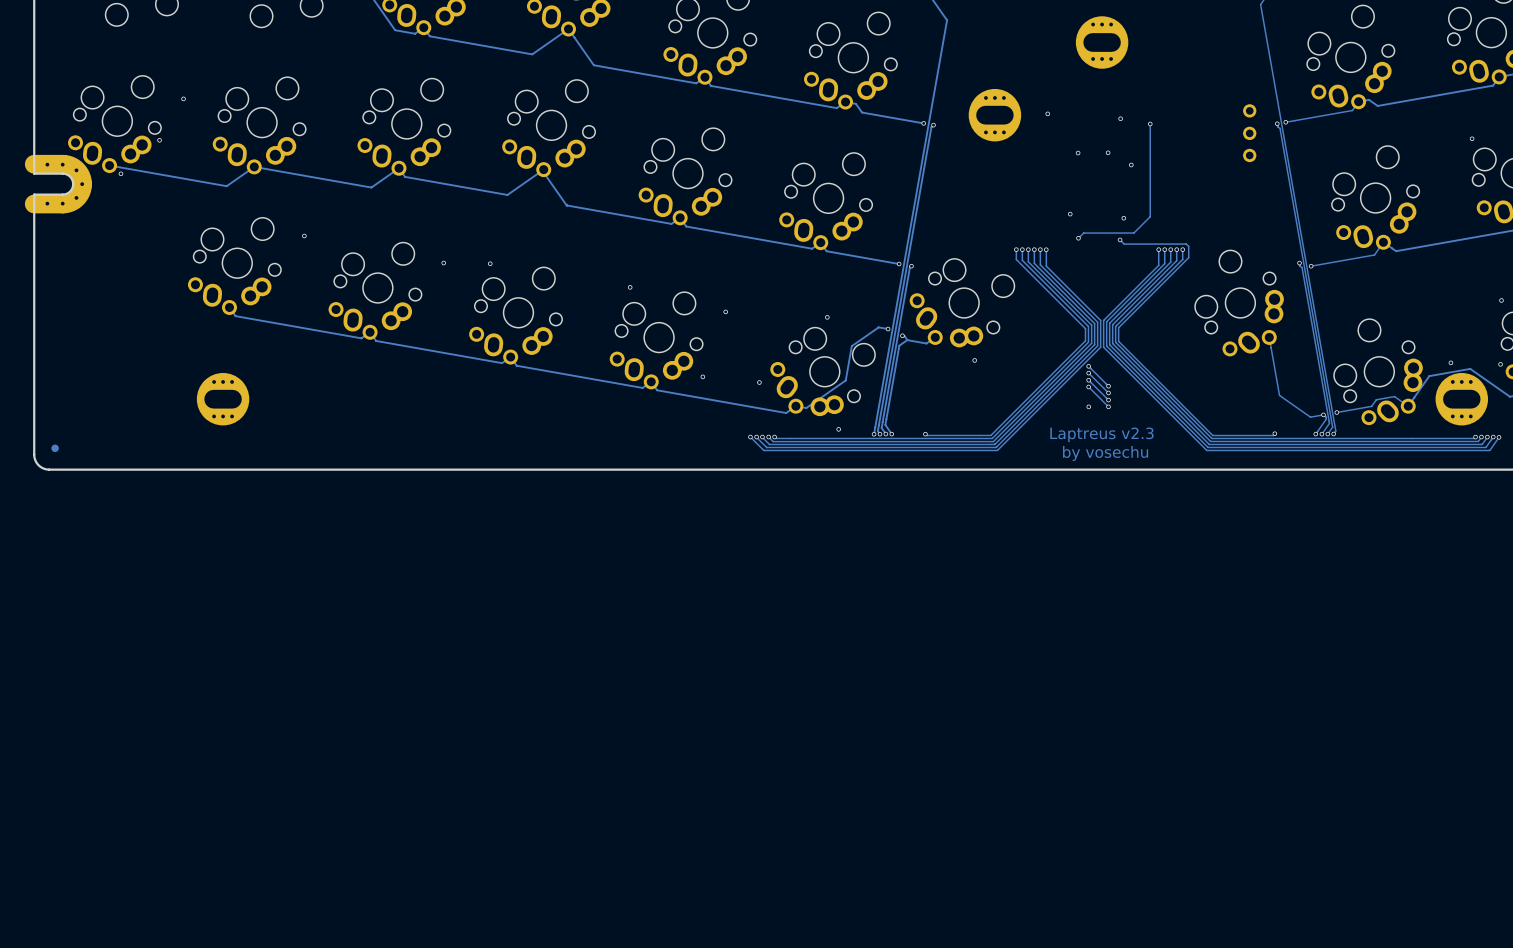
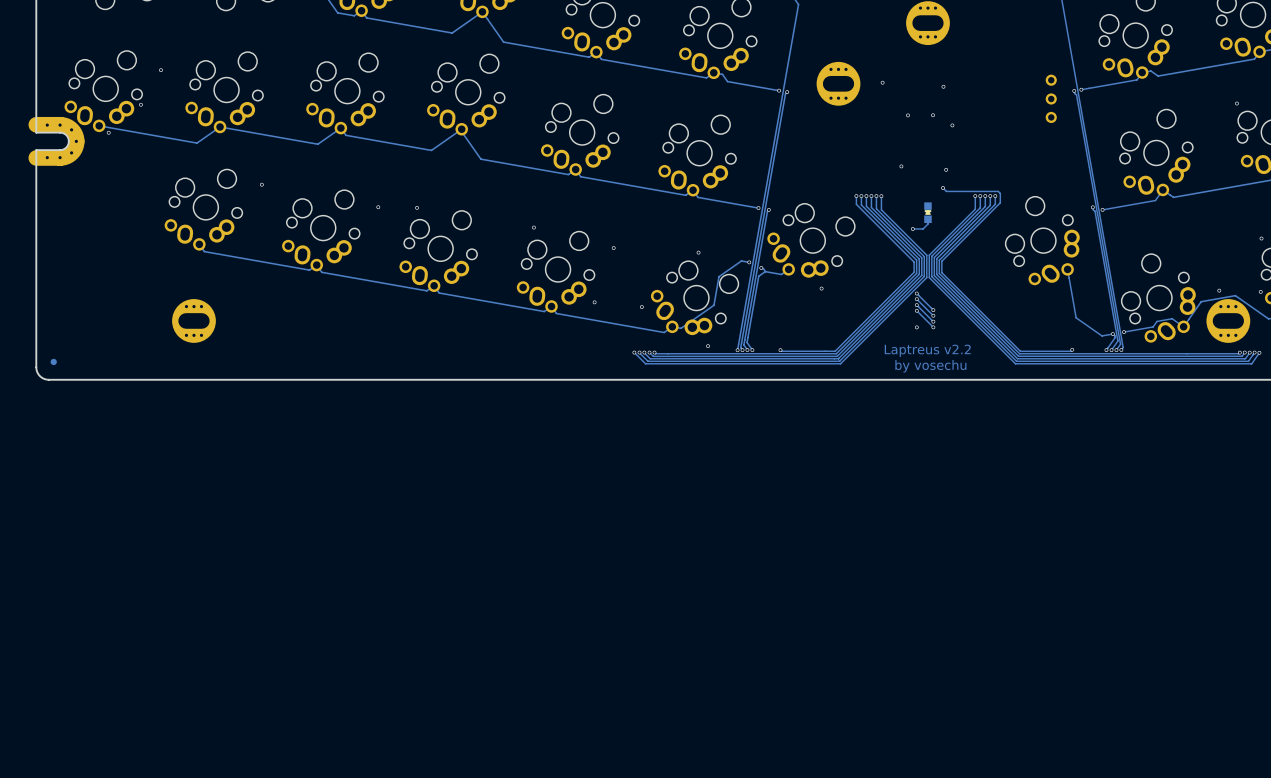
track: (1150, 123) (1150, 216) (1133, 233) (1083, 233) (1078, 238) -> none
via: (1150, 123) -> none
via: (1078, 238) -> none
part: none -> (927, 212)
track: none -> (928, 219) (928, 223) (923, 228) (912, 228)
via: none -> (912, 228)
text: Laptreus v2.3 (1101, 434) -> Laptreus v2.2 (927, 350)

